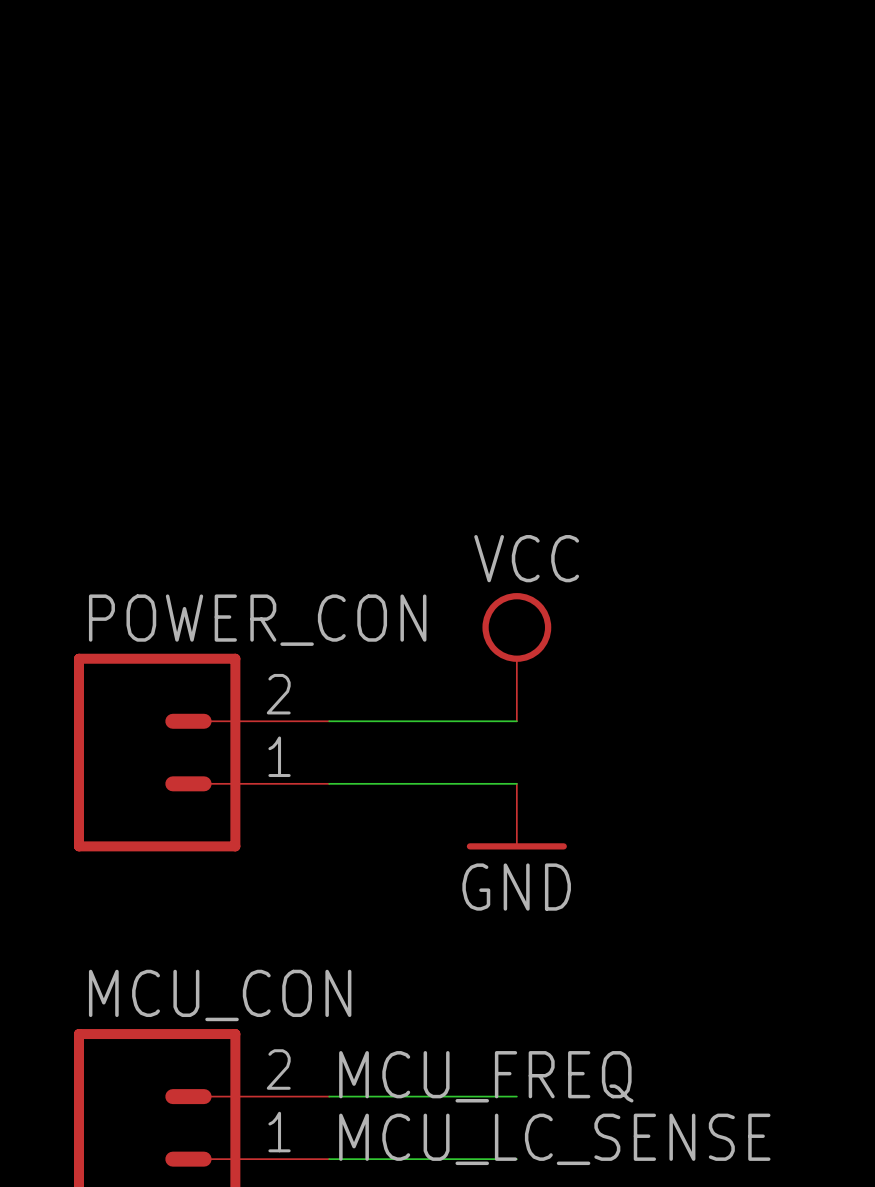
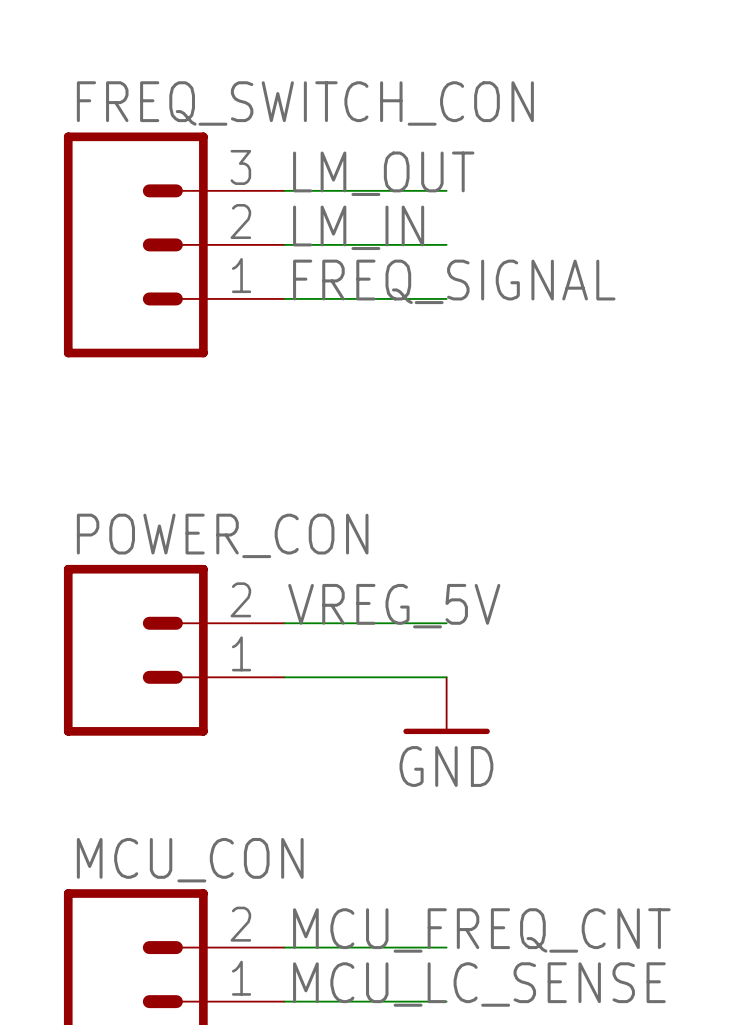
label: none -> LM_OUT (383, 173)
wire: none -> (284, 190) (446, 190)
label: none -> LM_IN (358, 227)
FREQ_SWITCH_CON: none -> (174, 244)
wire: none -> (284, 244) (446, 244)
label: none -> FREQ_SIGNAL (454, 281)
wire: none -> (284, 298) (446, 298)
power symbol: VCC (516, 657) -> none
label: none -> VREG_5V (394, 606)
label: MCU_FREQ (486, 1076) -> MCU_FREQ_CNT (481, 930)

